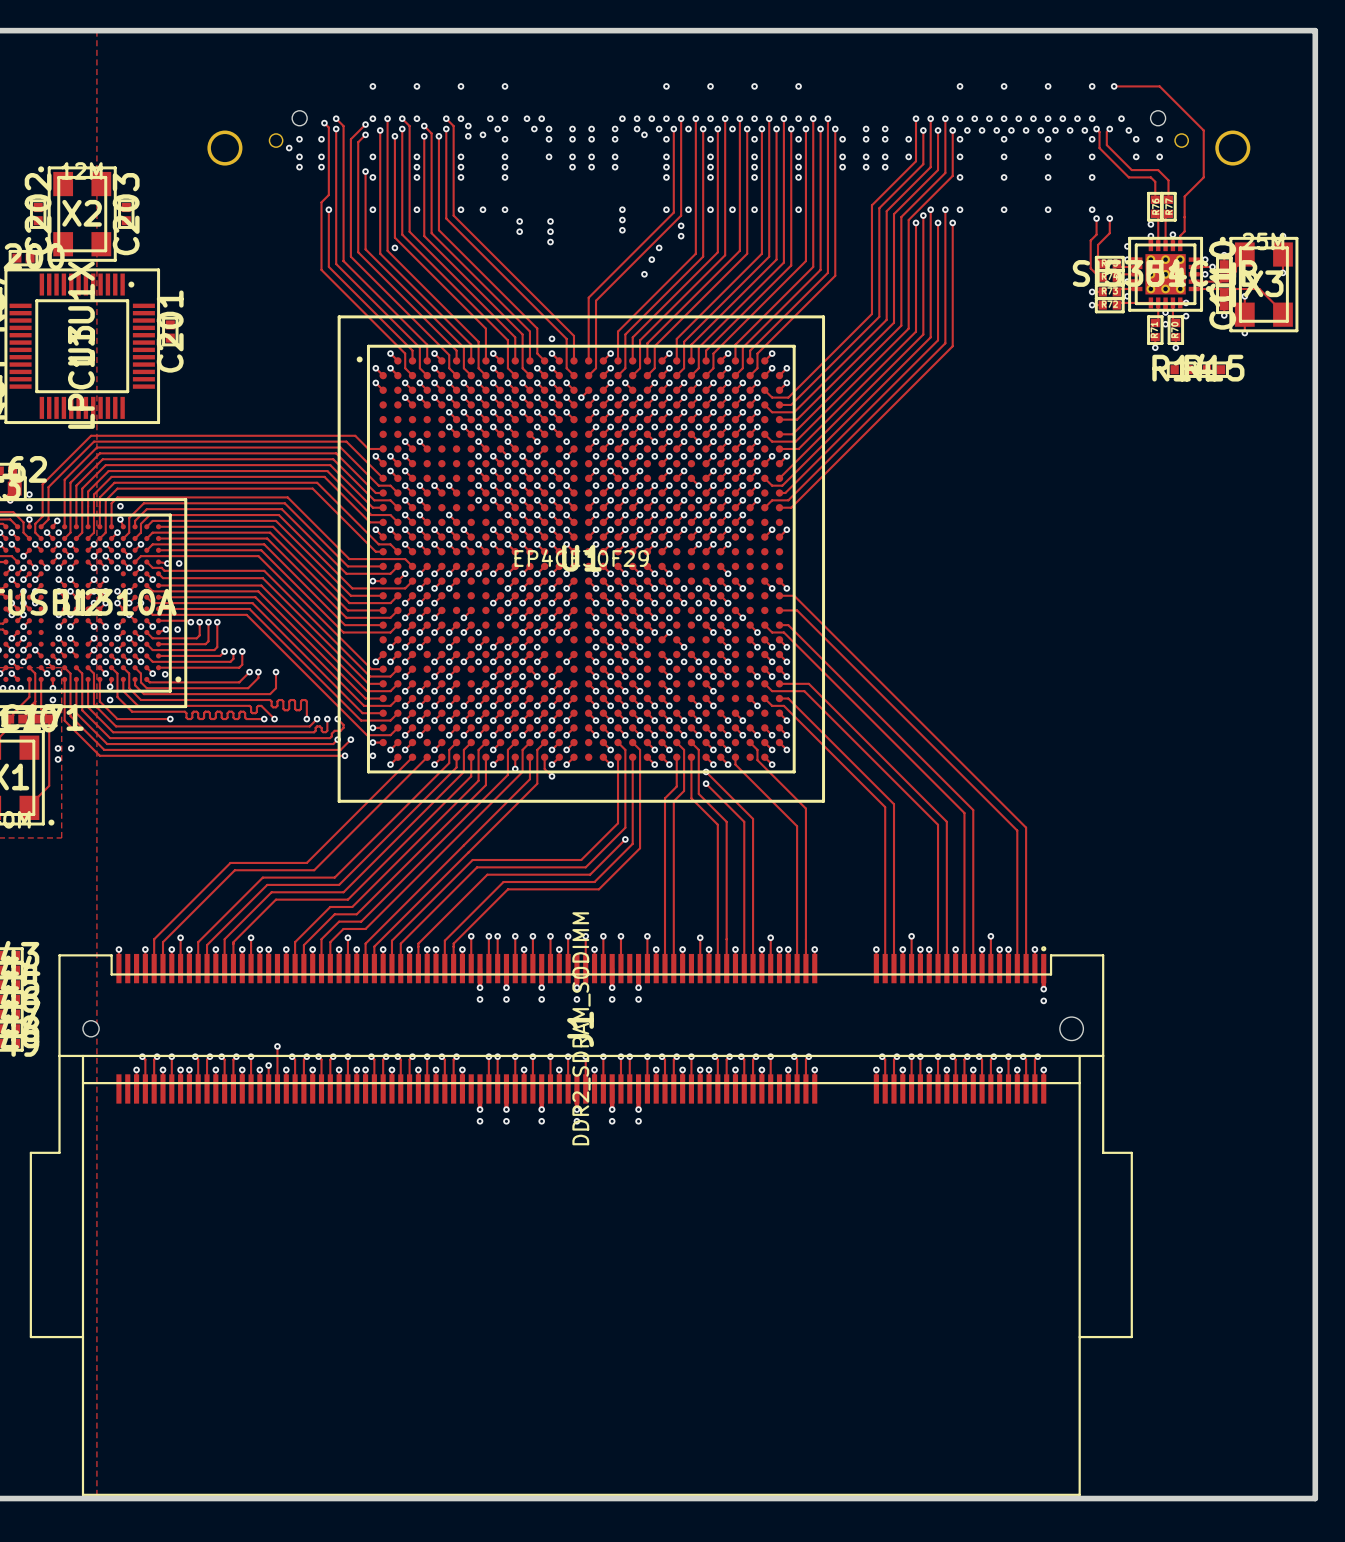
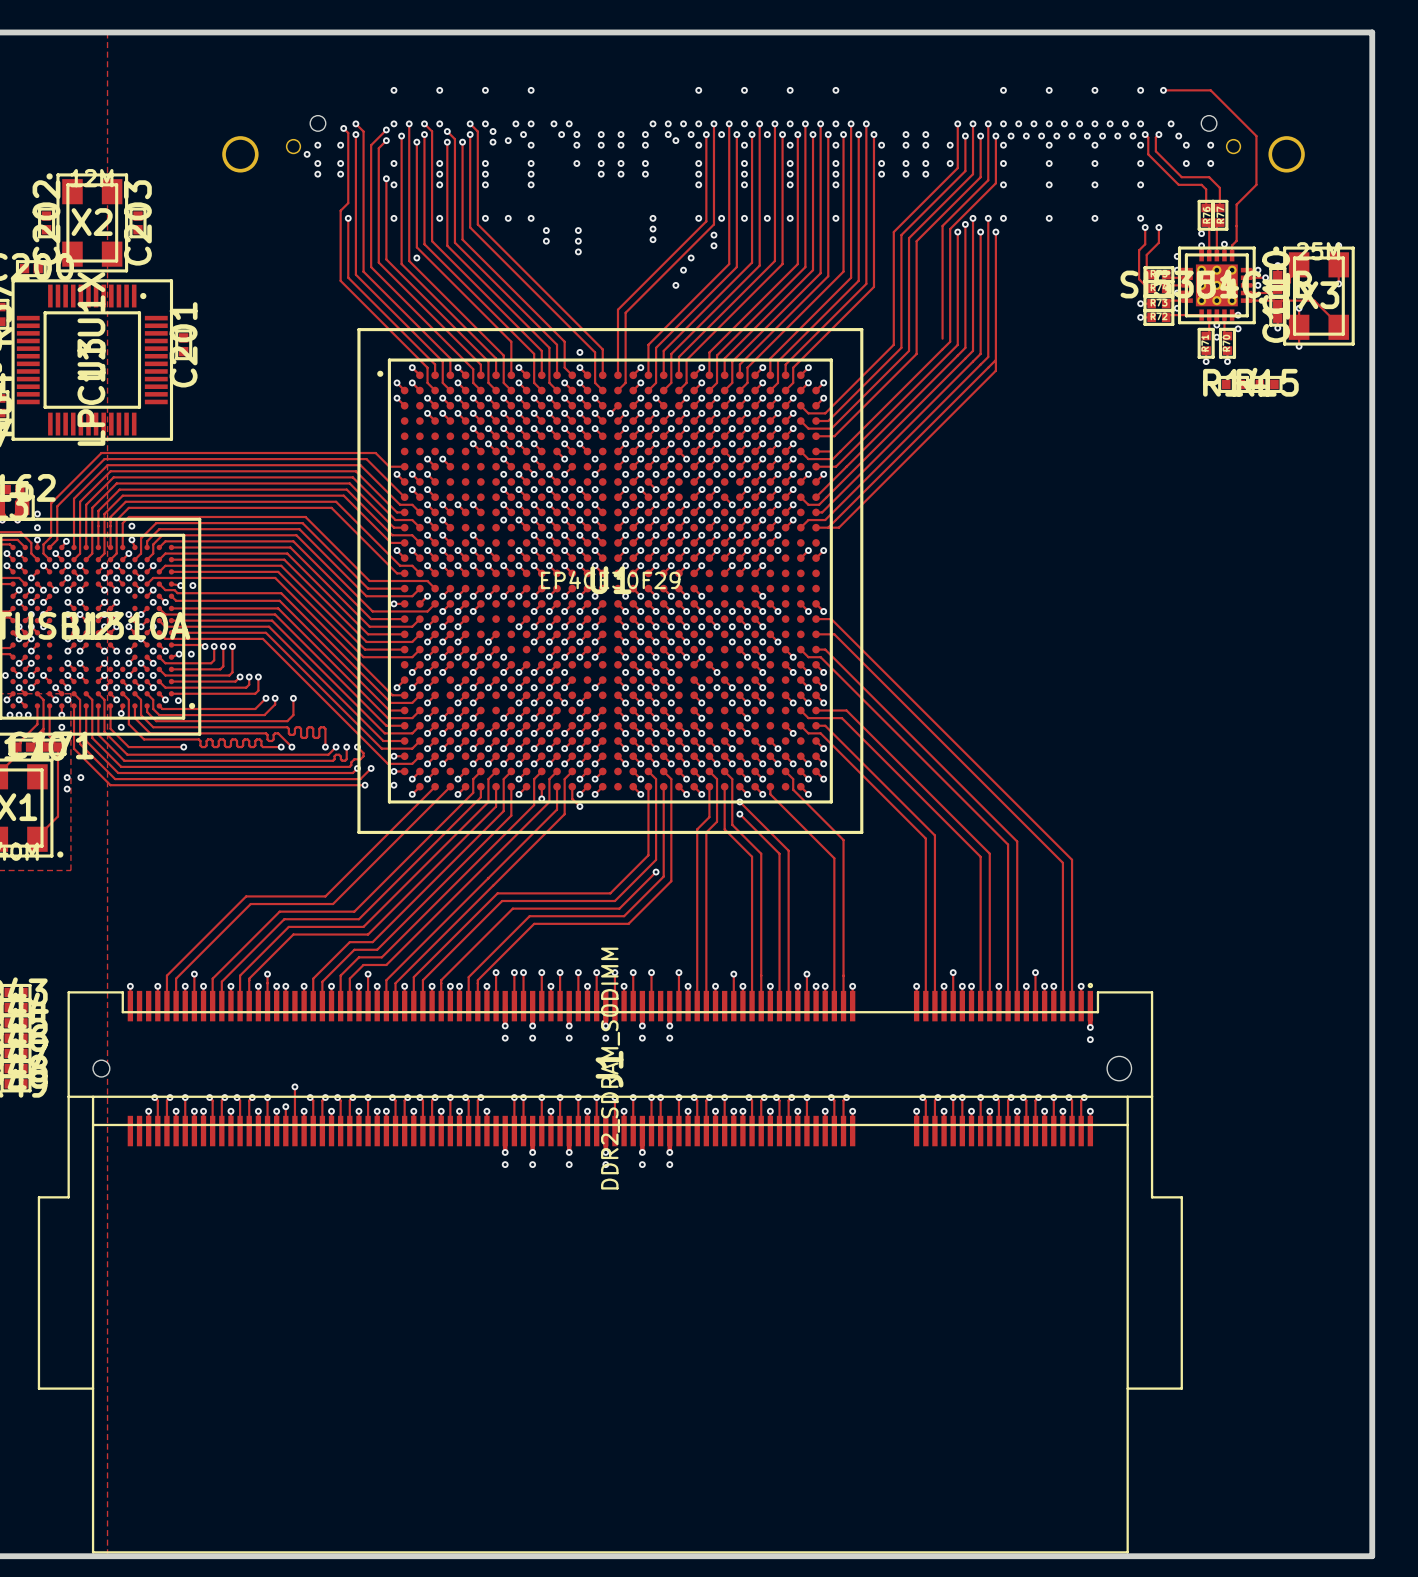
track: (871, 205) (871, 314) (854, 331) -> (912, 213) (893, 232) (893, 344)
track: (879, 208) (879, 316) (861, 334) -> (919, 216) (901, 235) (901, 347)
track: (886, 211) (886, 319) (869, 337) -> (927, 219) (909, 238) (909, 350)
track: (894, 214) (894, 322) (876, 340) -> (934, 222) (916, 241) (916, 353)
track: (901, 325) (792, 434) -> none
track: none -> (995, 360) (995, 370) (838, 527) (828, 527)

